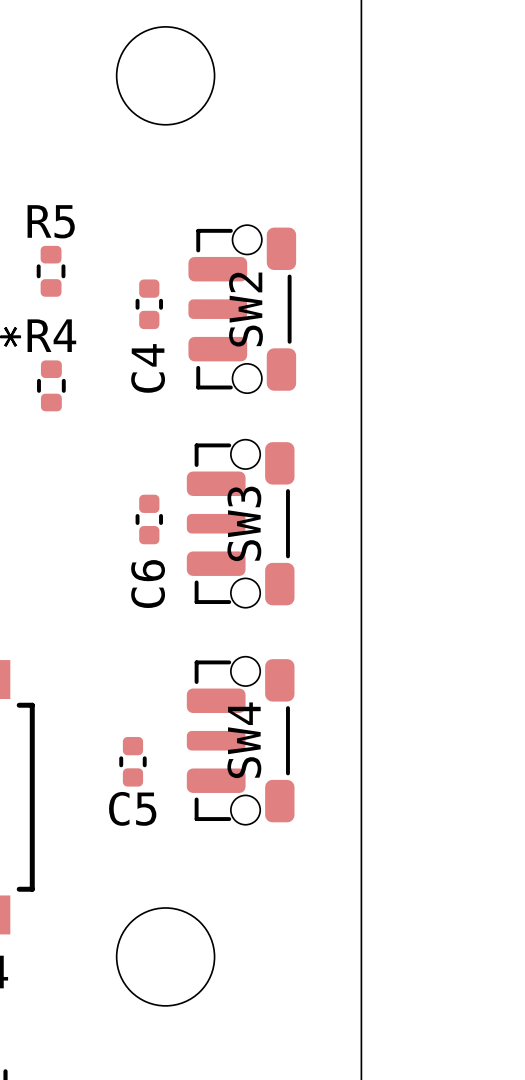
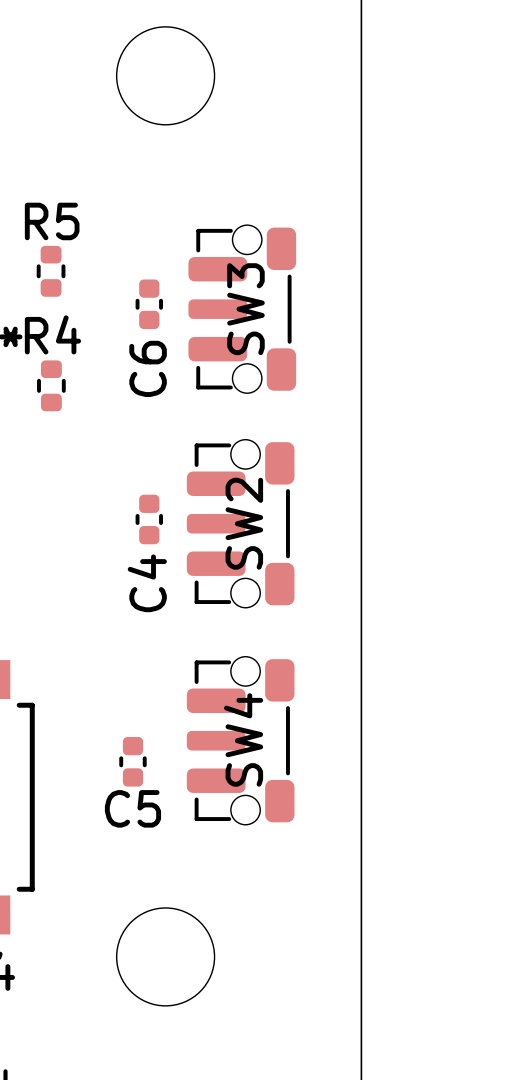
SW2 name: SW2 (245, 309) -> SW3 (245, 309)
C4 name: C4 (148, 368) -> C6 (148, 368)
SW3 name: SW3 (244, 523) -> SW2 (244, 523)
C6 name: C6 (148, 584) -> C4 (147, 583)

